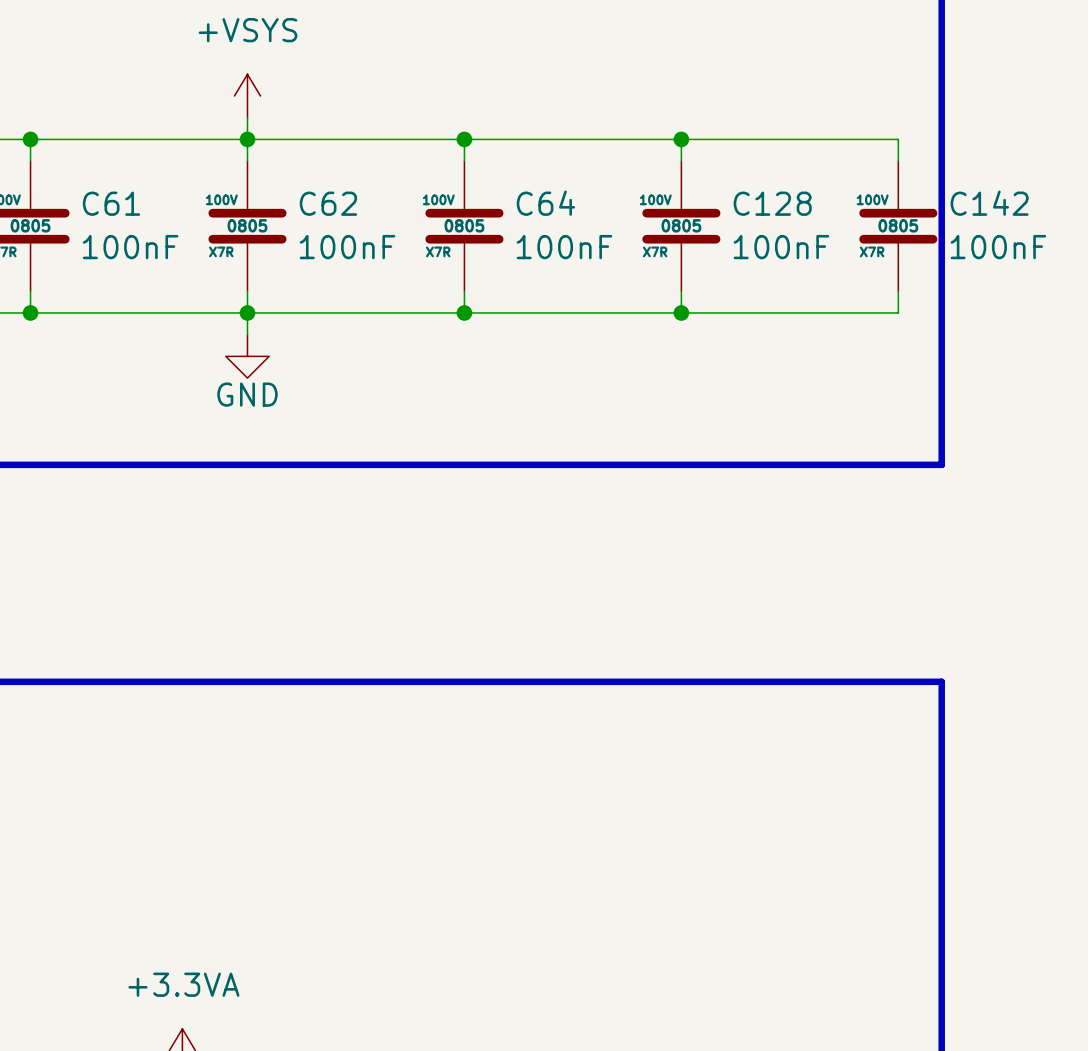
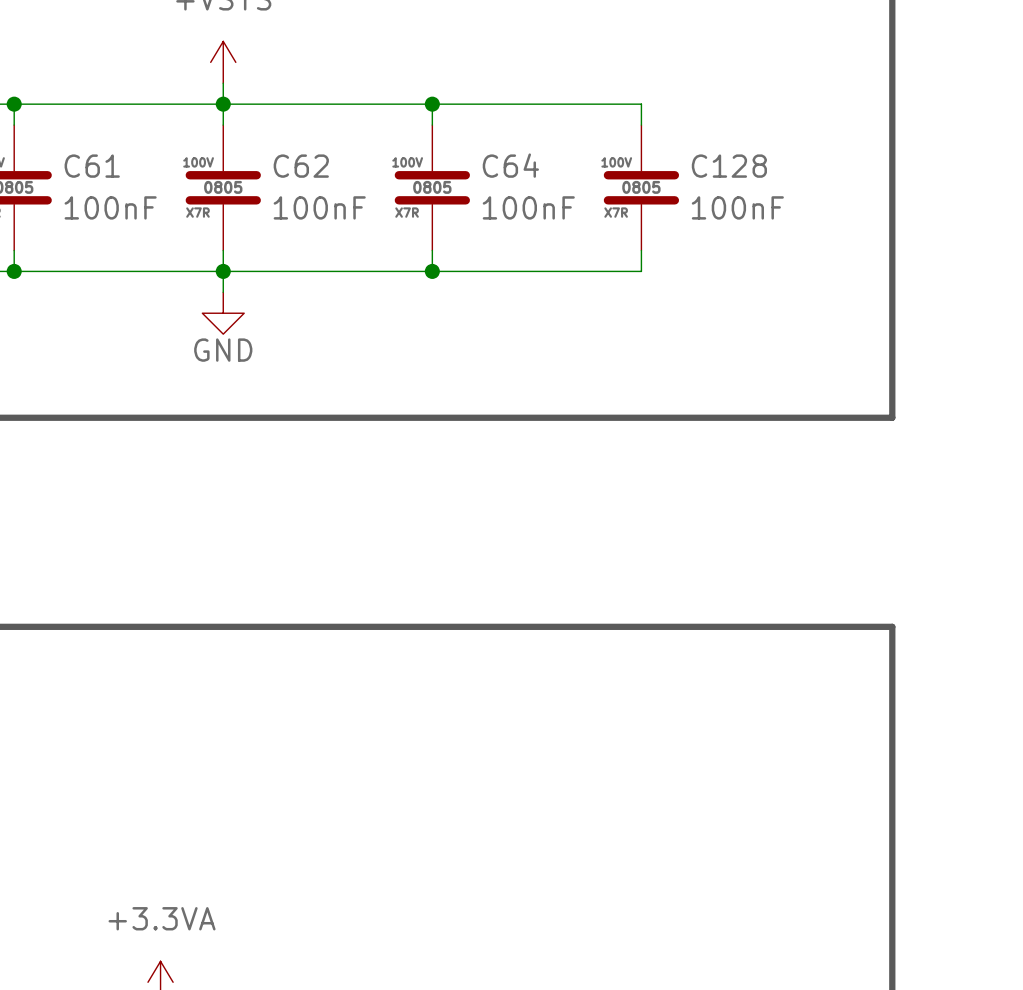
wire: (681, 139) (898, 139) (898, 161) -> none
junction: (681, 139) -> none
C142: 100nF (898, 226) -> none
wire: (898, 291) (898, 312) (681, 312) -> none
junction: (681, 312) -> none

